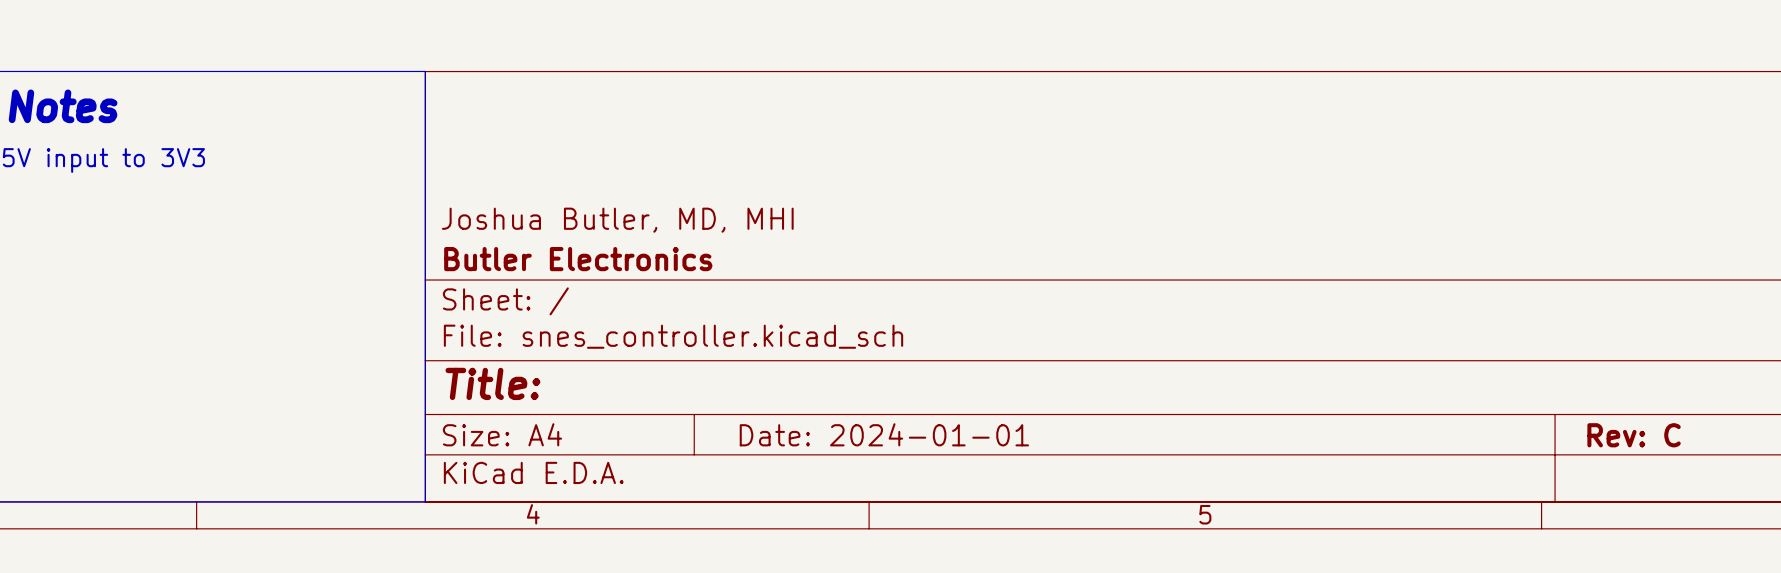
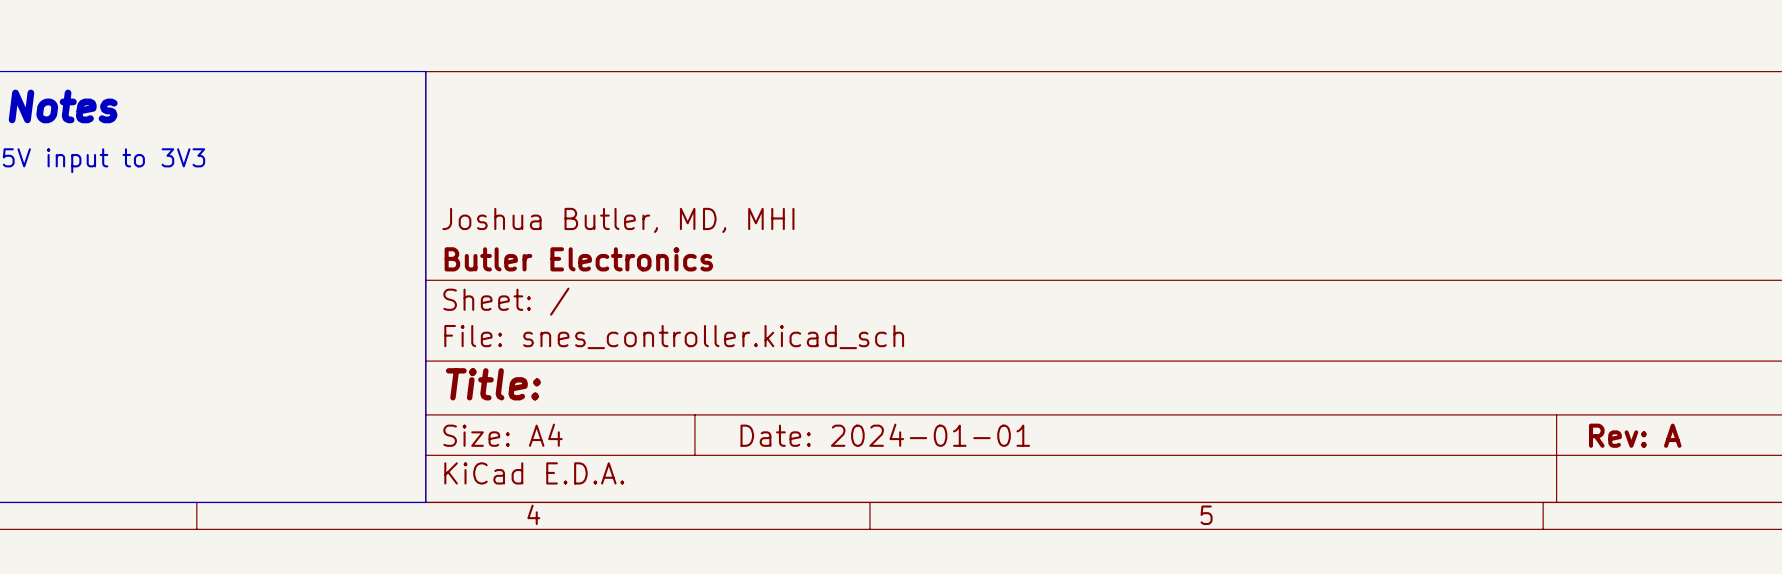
title block: Rev: C (1634, 435) -> Rev: A (1635, 435)

